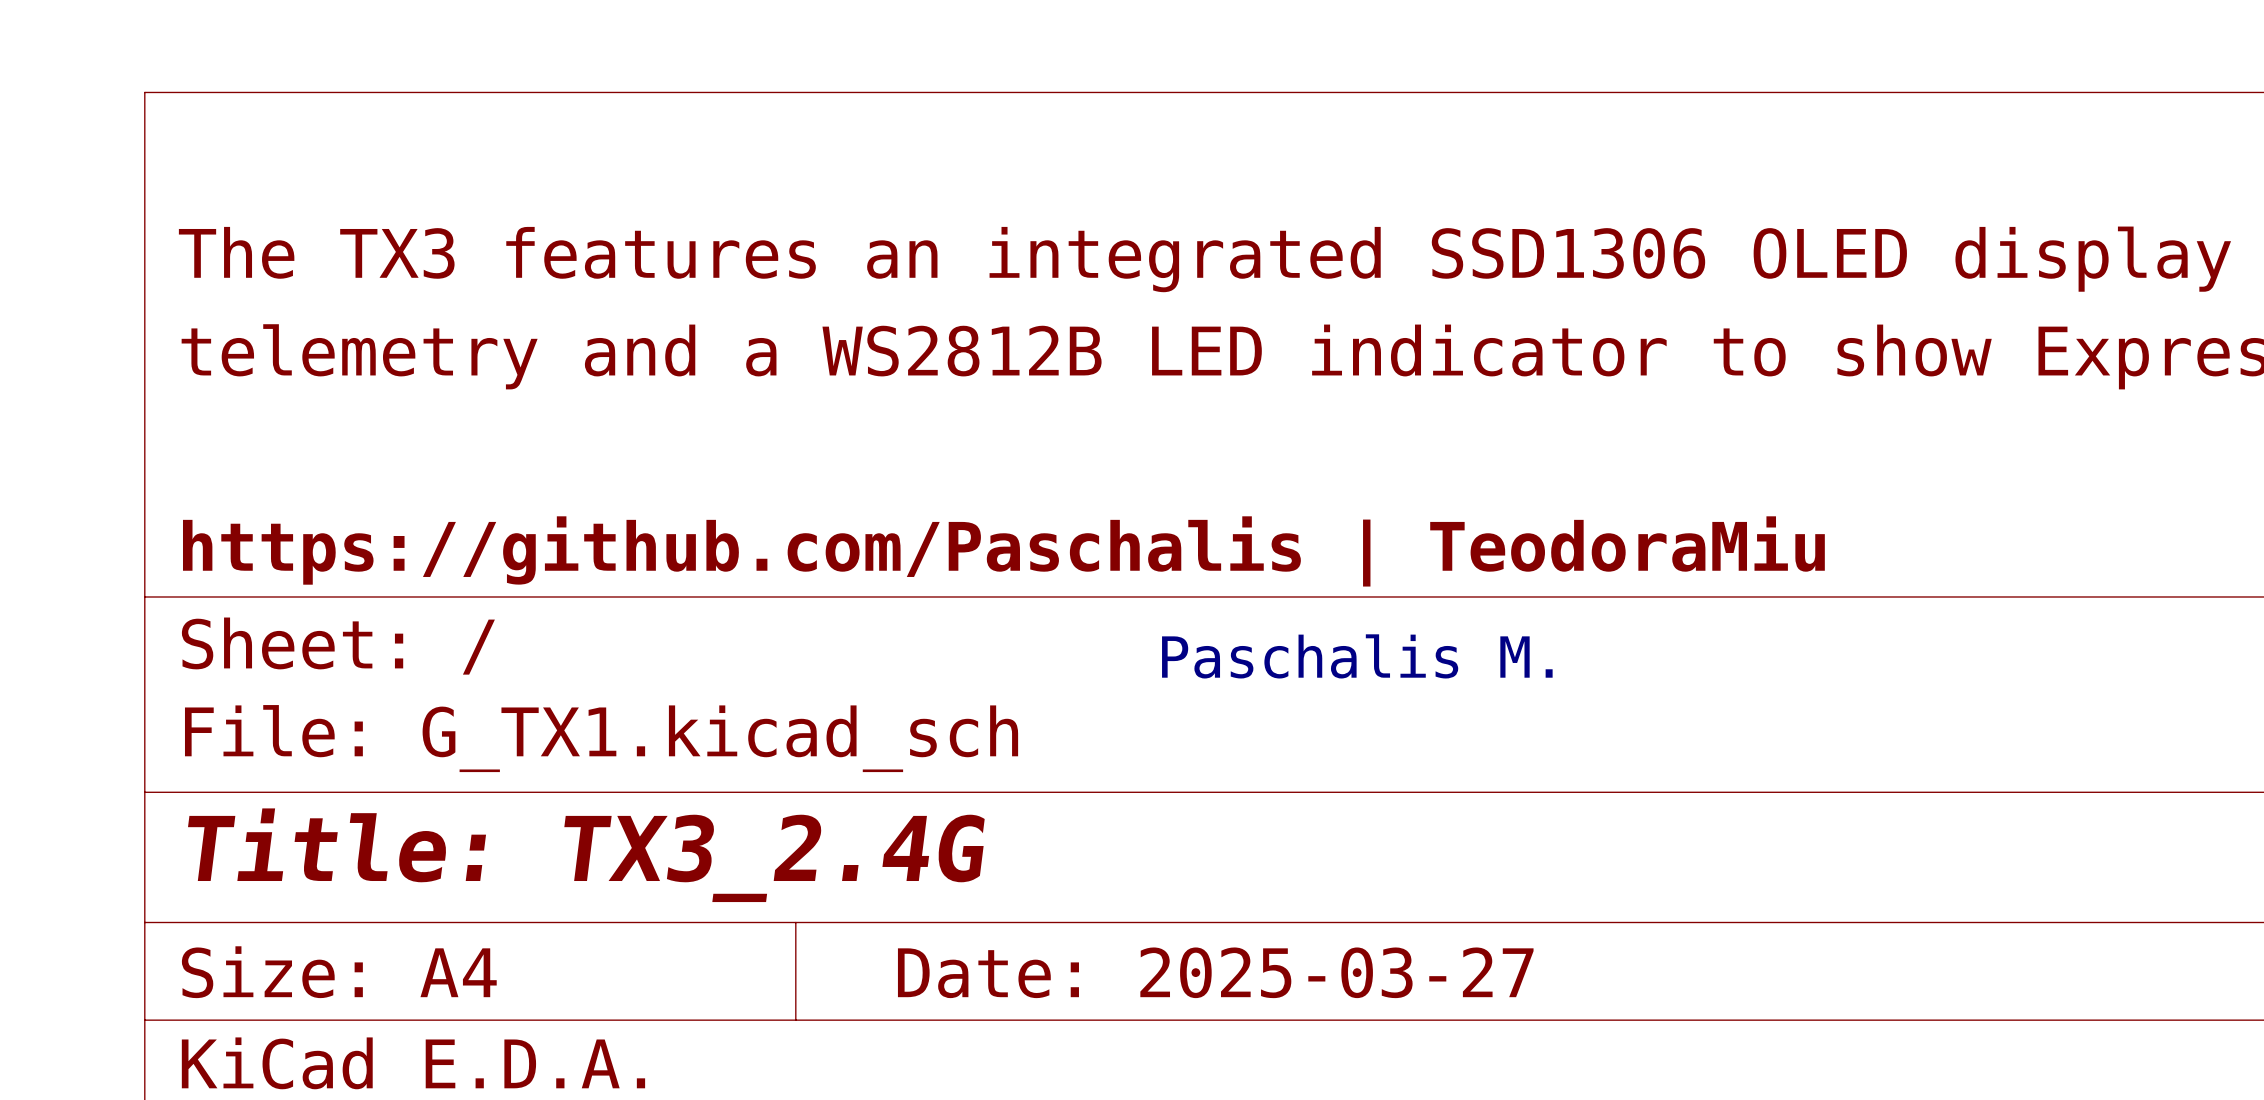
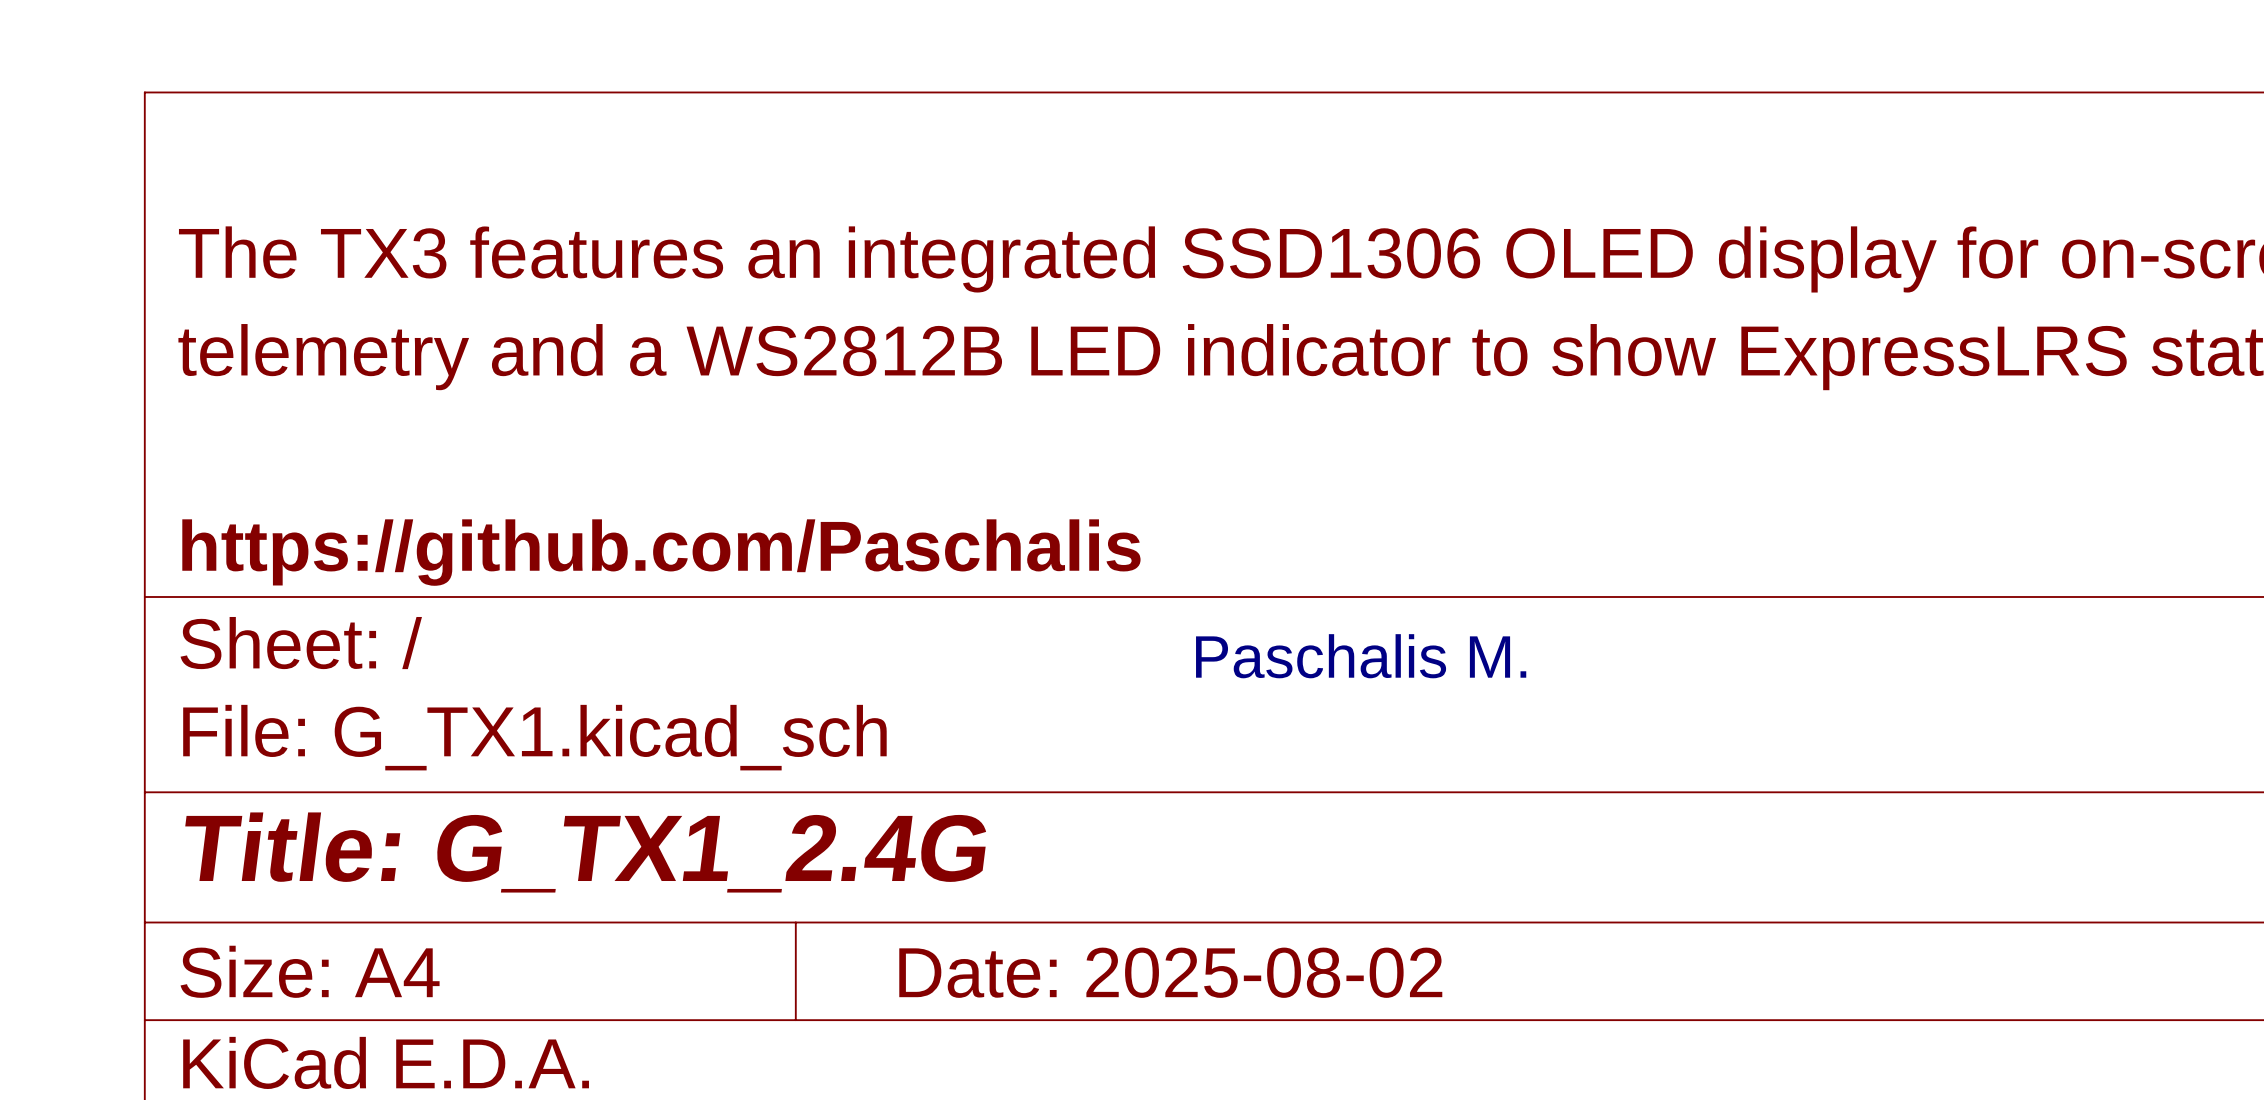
title block: https://github.com/Paschalis | TeodoraMiu (1003, 551) -> https://github.com/Paschalis (661, 552)
title block: Title: TX3_2.4G (586, 855) -> Title: G_TX1_2.4G (585, 852)
title block: Date: 2025-03-27 (1215, 972) -> Date: 2025-08-02 (1170, 972)

